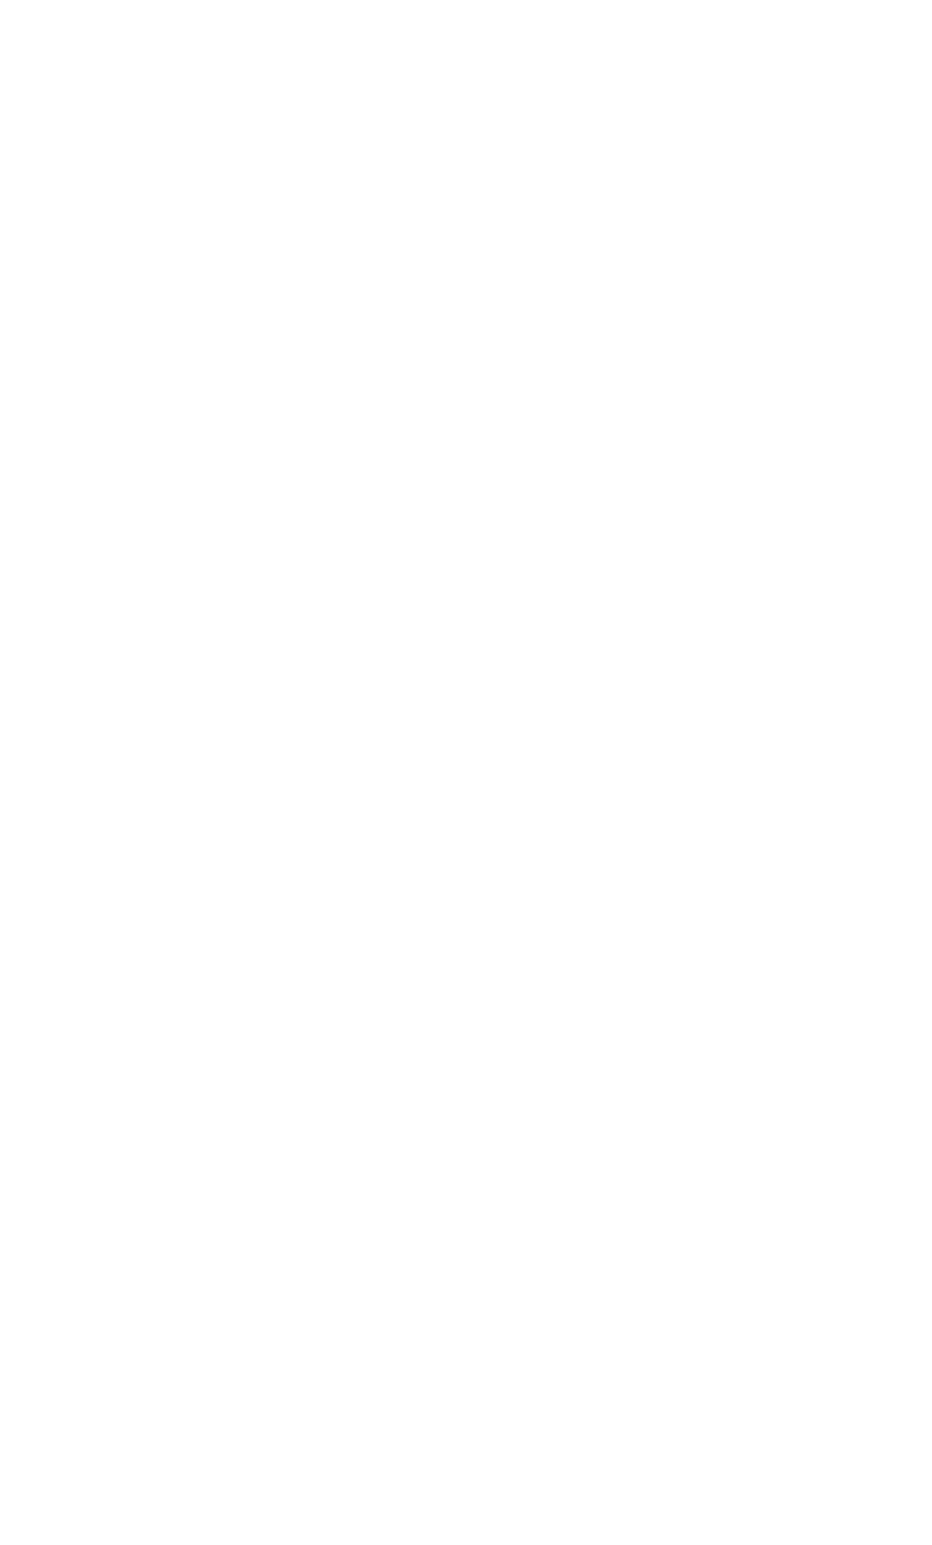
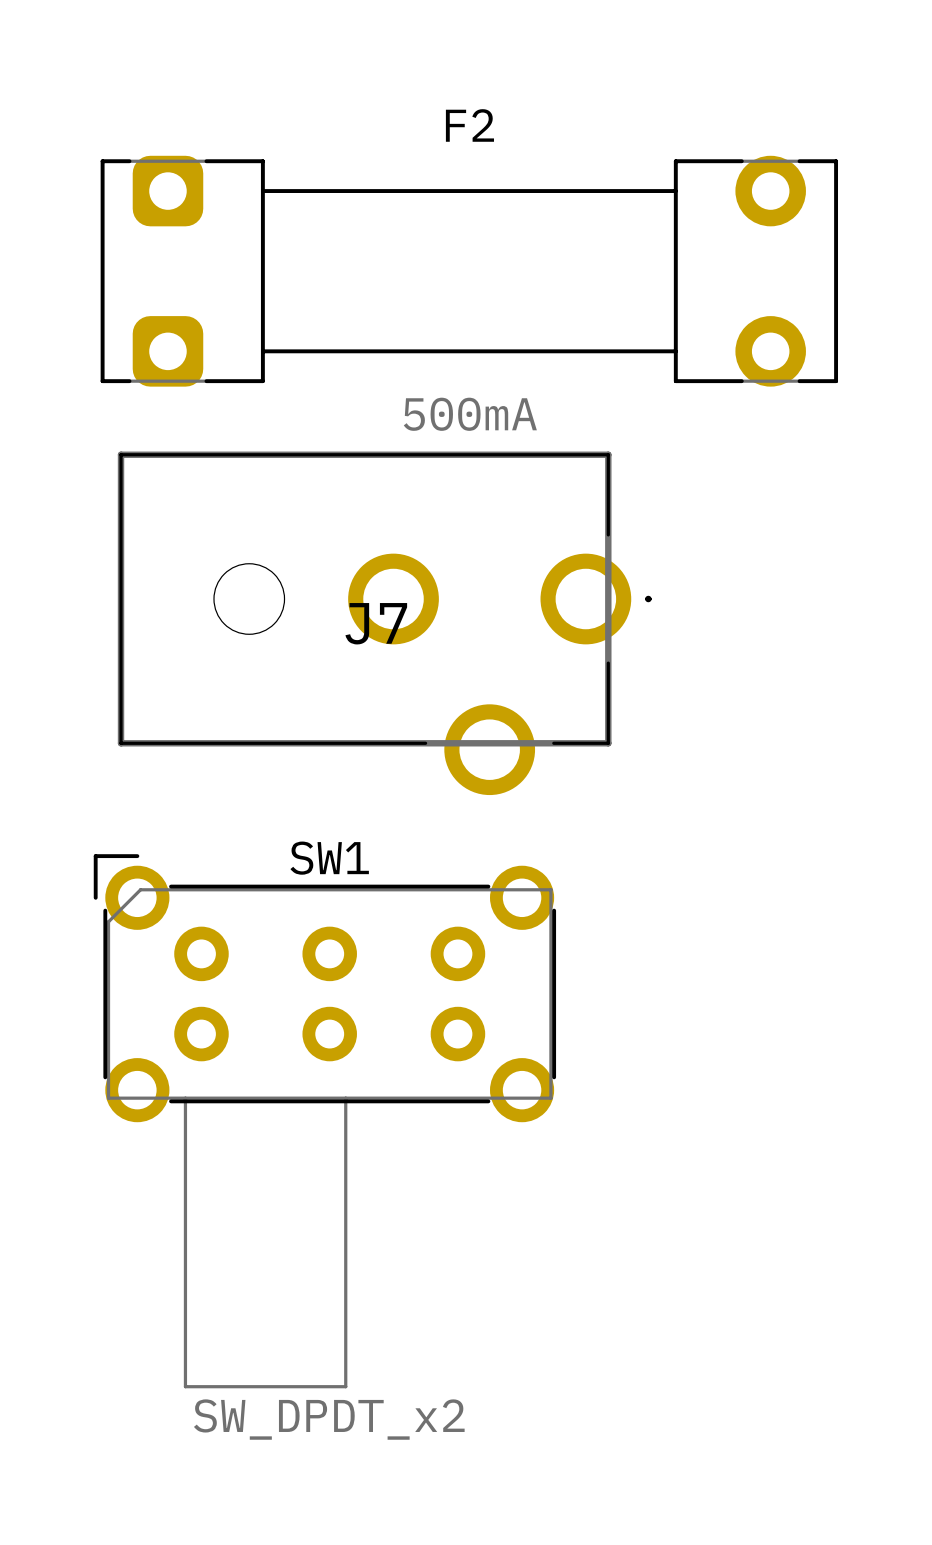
F2: none -> 500mA (469, 271)
J7: none -> (384, 623)
SW1: none -> SW_DPDT_x2 (324, 1121)

